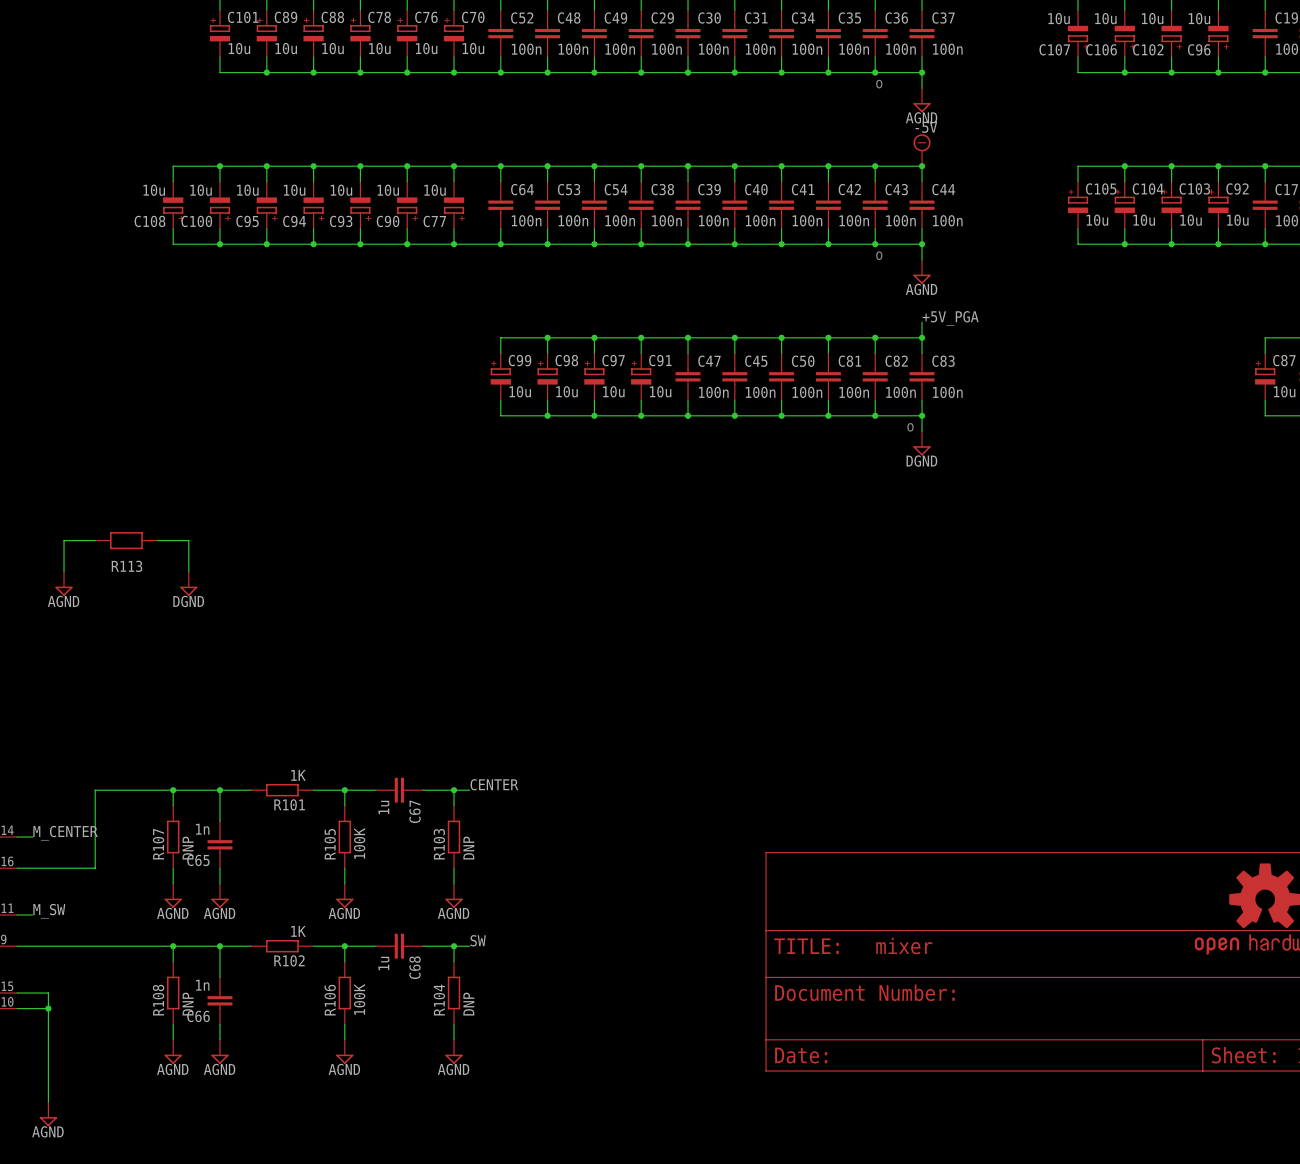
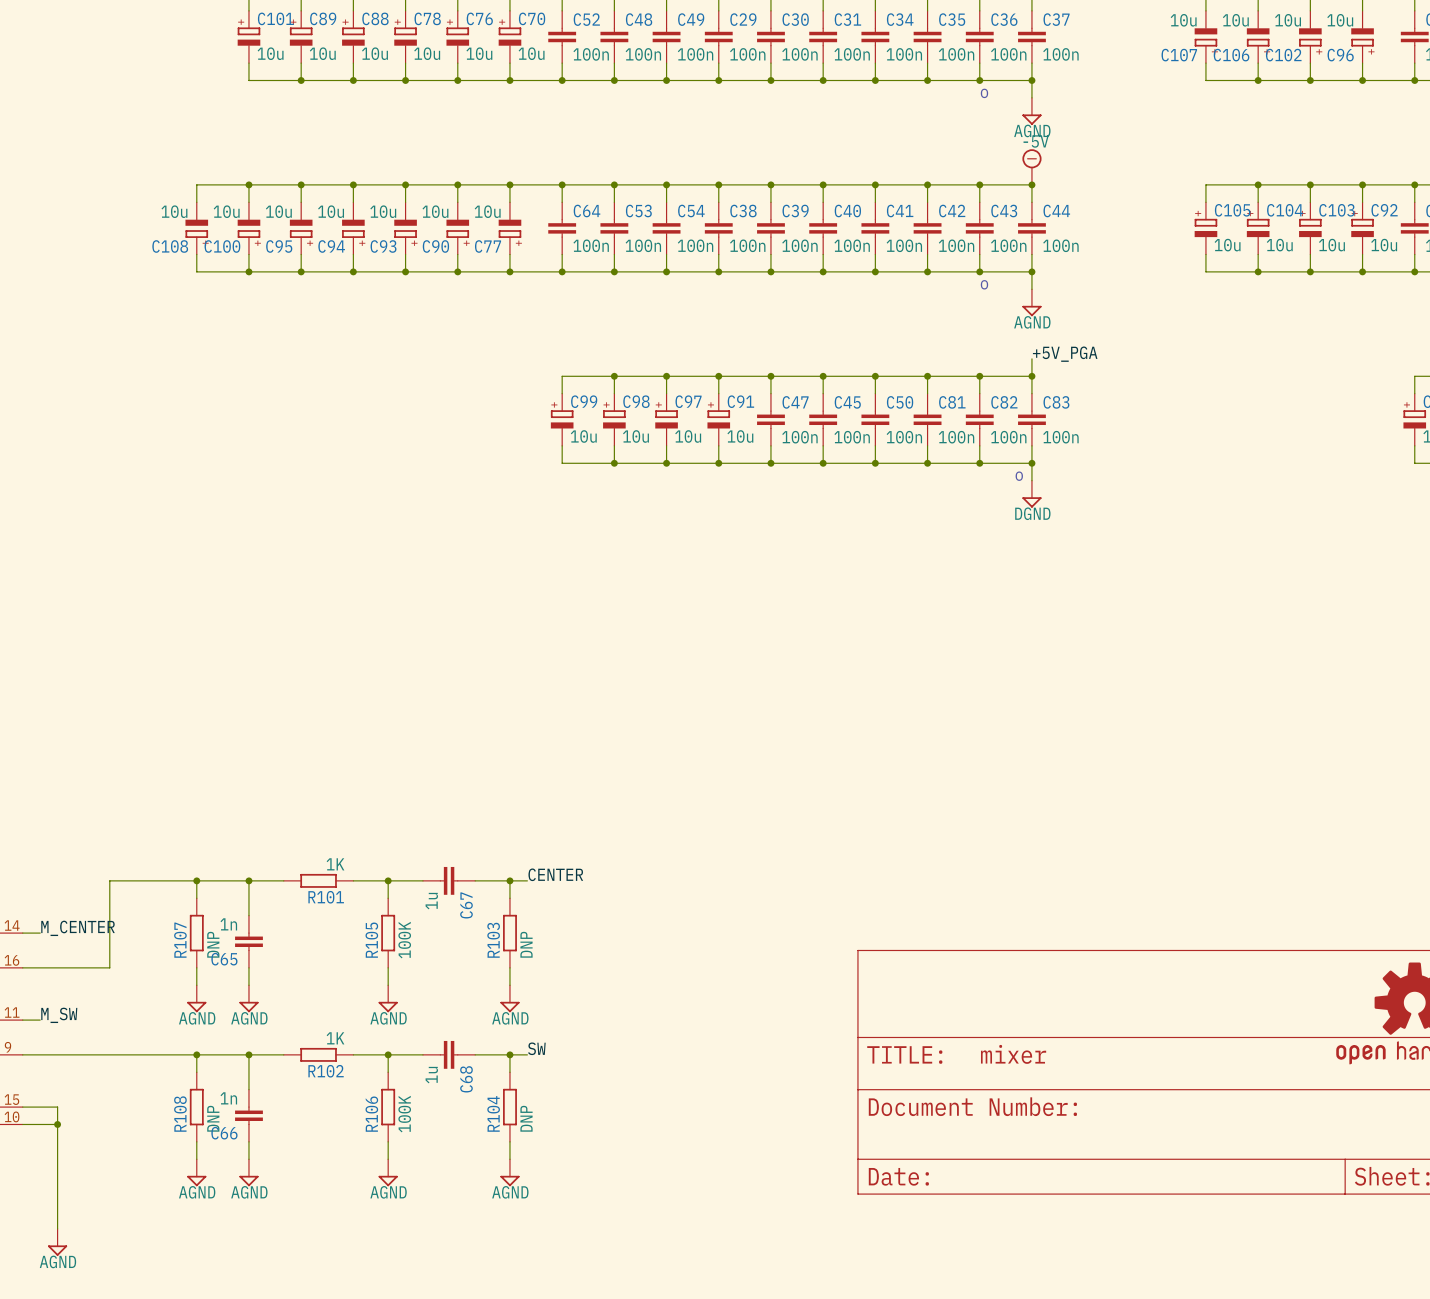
wire: (95, 540) (64, 540) (64, 571) -> none
R113: (126, 540) -> none
wire: (157, 540) (188, 540) (188, 571) -> none
power symbol: AGND (64, 583) -> none
power symbol: DGND (188, 583) -> none

